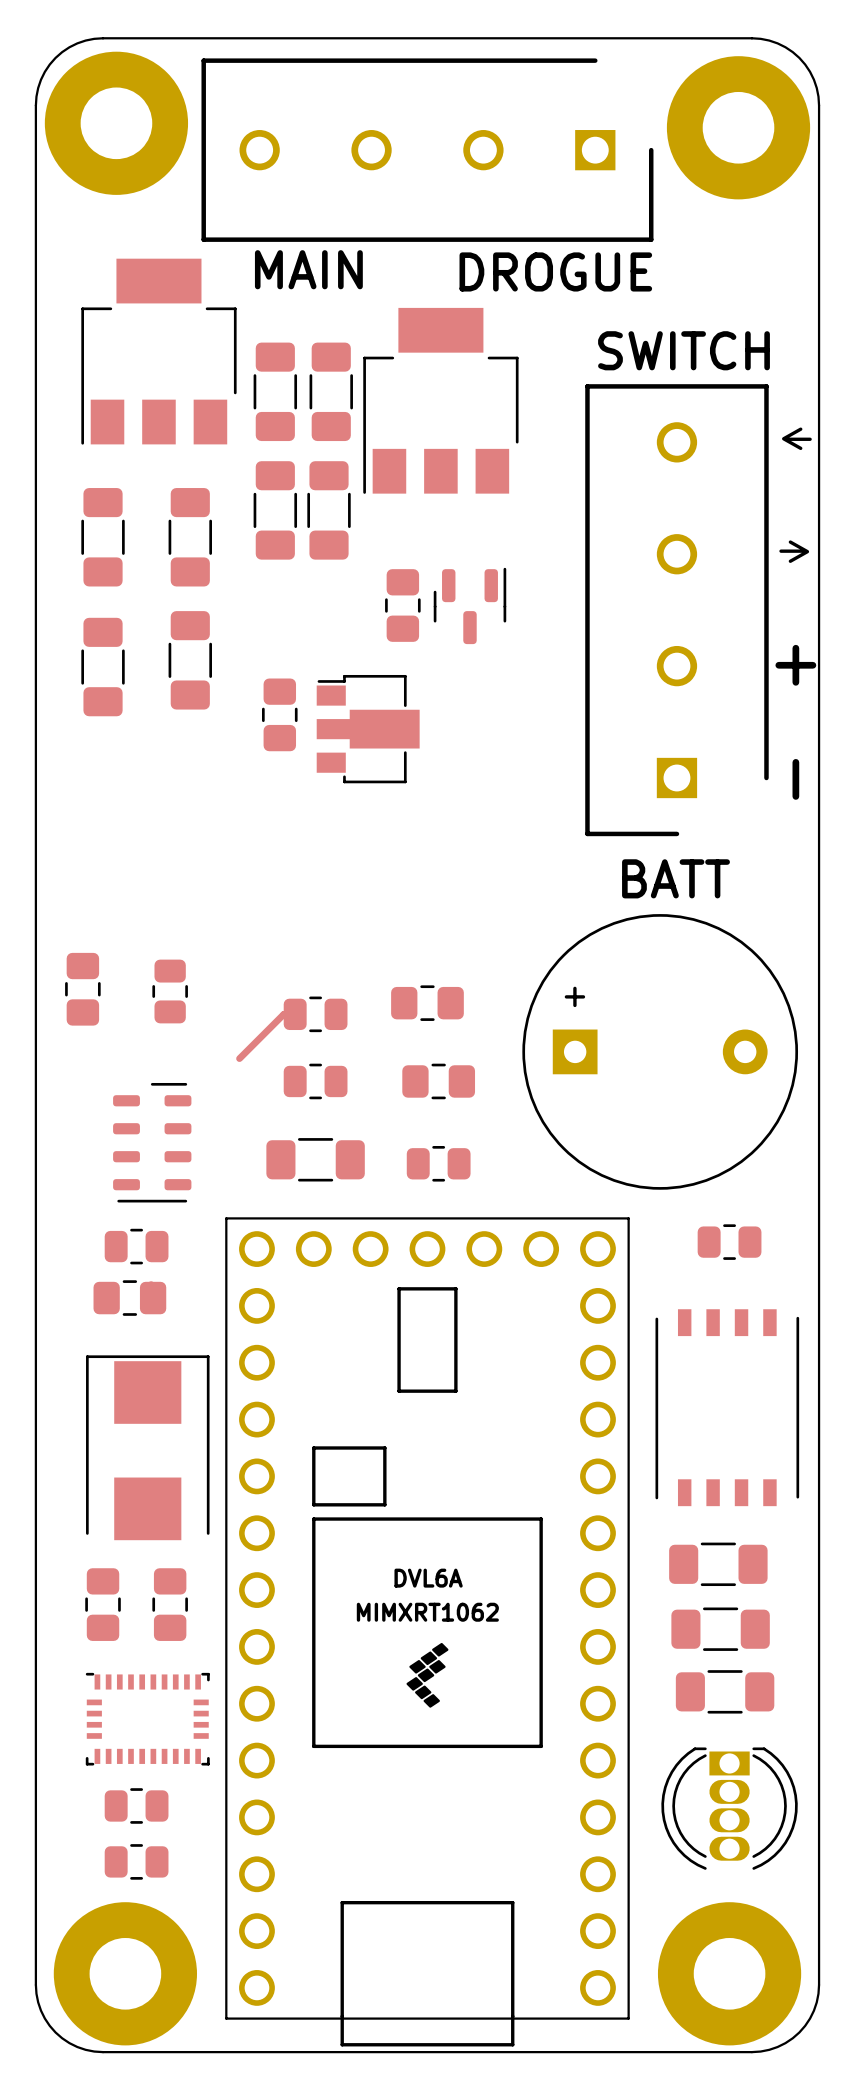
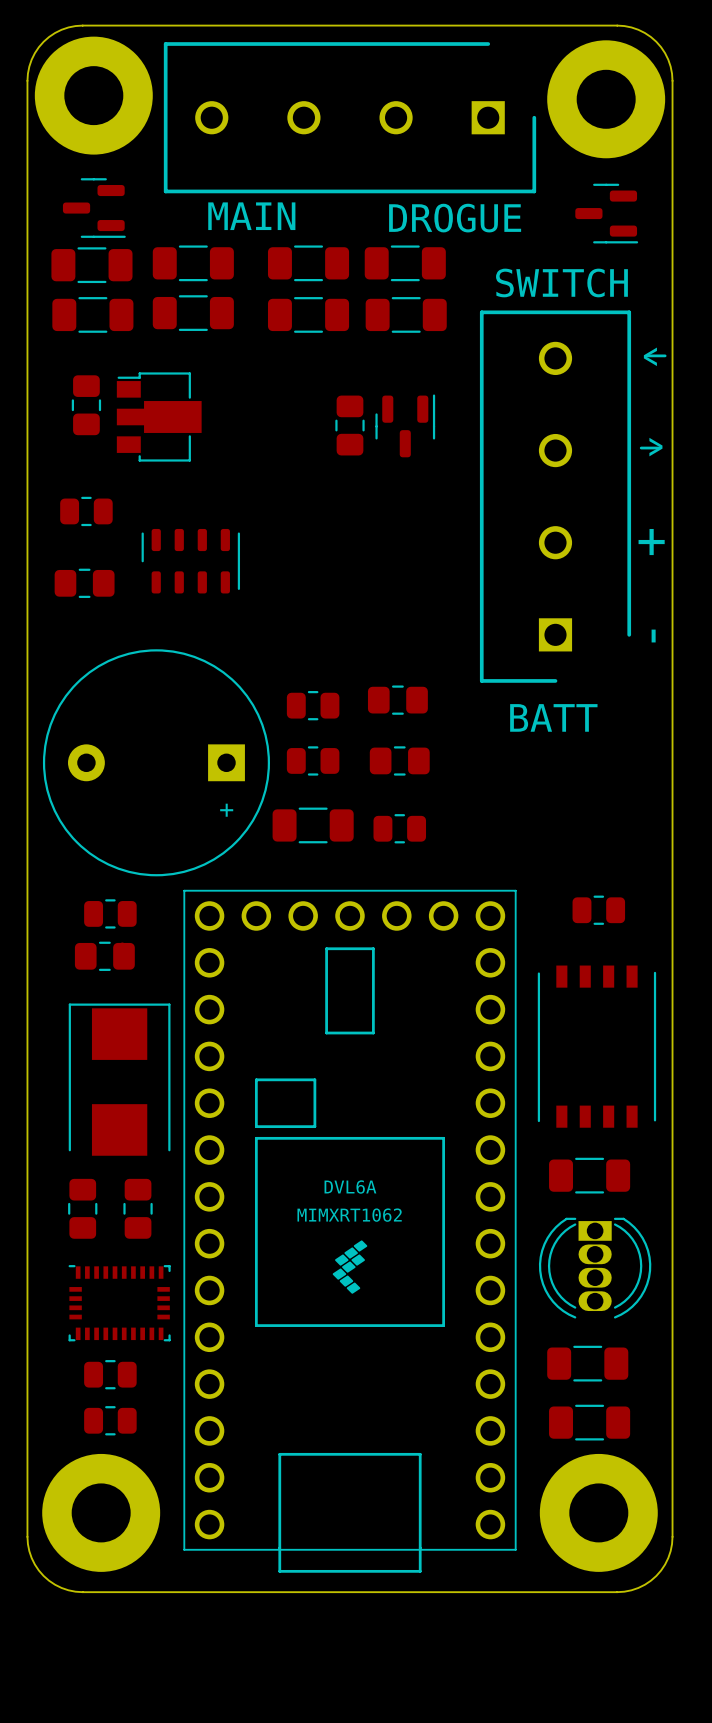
part: none -> (94, 208)
part: none -> (606, 213)
part: none -> (193, 263)
part: none -> (308, 263)
part: none -> (405, 263)
part: none -> (91, 265)
part: (158, 351) -> none
part: none -> (193, 313)
part: none -> (92, 314)
part: none -> (308, 314)
part: none -> (406, 314)
part: (275, 391) -> none
part: (331, 391) -> none
part: (440, 400) -> none
part: none -> (86, 405)
part: (275, 510) -> none
part: (329, 510) -> none
part: (103, 537) -> none
part: (190, 537) -> none
part position: (402, 605) -> (349, 425)
part position: (469, 605) -> (405, 425)
part: none -> (86, 511)
part: (190, 660) -> none
part: (103, 667) -> none
part: (279, 714) -> none
part: none -> (84, 583)
part position: (368, 729) -> (159, 416)
part: none -> (397, 700)
part: none -> (313, 705)
part: none -> (313, 760)
part: none -> (399, 760)
part: (82, 989) -> none
part: (170, 991) -> none
part: (427, 1003) -> none
part: none -> (399, 828)
top track: (295, 1014) (283, 1014) (239, 1058) -> none
part: (315, 1014) -> none
part rotation: 0° (660, 1051) -> 180° (156, 762)
part position: (660, 1051) -> (156, 762)
part: (315, 1081) -> none
part: (438, 1081) -> none
part: none -> (110, 913)
part rotation: 0° (152, 1142) -> 90° counterclockwise (190, 561)
part position: (152, 1142) -> (190, 561)
part position: (315, 1159) -> (313, 825)
part: (438, 1163) -> none
part: none -> (104, 956)
part position: (729, 1242) -> (598, 910)
part: (136, 1246) -> none
part: (129, 1298) -> none
part position: (727, 1407) -> (596, 1046)
part: none -> (589, 1175)
part position: (147, 1447) -> (119, 1079)
part: none -> (82, 1208)
part: none -> (138, 1208)
part footprint: [669, 1542, 768, 1587] -> [538, 1217, 652, 1319]
part: none -> (119, 1303)
part: (103, 1604) -> none
part: (170, 1604) -> none
part: (720, 1629) -> none
part position: (427, 1631) -> (349, 1231)
part: none -> (587, 1363)
part footprint: [85, 1672, 210, 1766] -> [84, 1406, 137, 1436]
part: none -> (110, 1374)
part: (725, 1691) -> none
part: none -> (589, 1422)
part: (136, 1805) -> none
part: (729, 1808) -> none
part: (136, 1861) -> none
board edge: (35, 1873) (35, 1984) (41, 2010) (49, 2025) (69, 2043) (85, 2049) (103, 2052) (751, 2052) (769, 2049) (785, 2043) (799, 2032) (810, 2018) (816, 2002) (819, 1984) (819, 1873) -> (27, 1536) (31, 1558) (43, 1575) (61, 1587) (82, 1592) (624, 1591) (644, 1584) (661, 1570) (670, 1551) (672, 1536)
part position: (125, 1973) -> (101, 1512)
part position: (729, 1973) -> (598, 1512)

